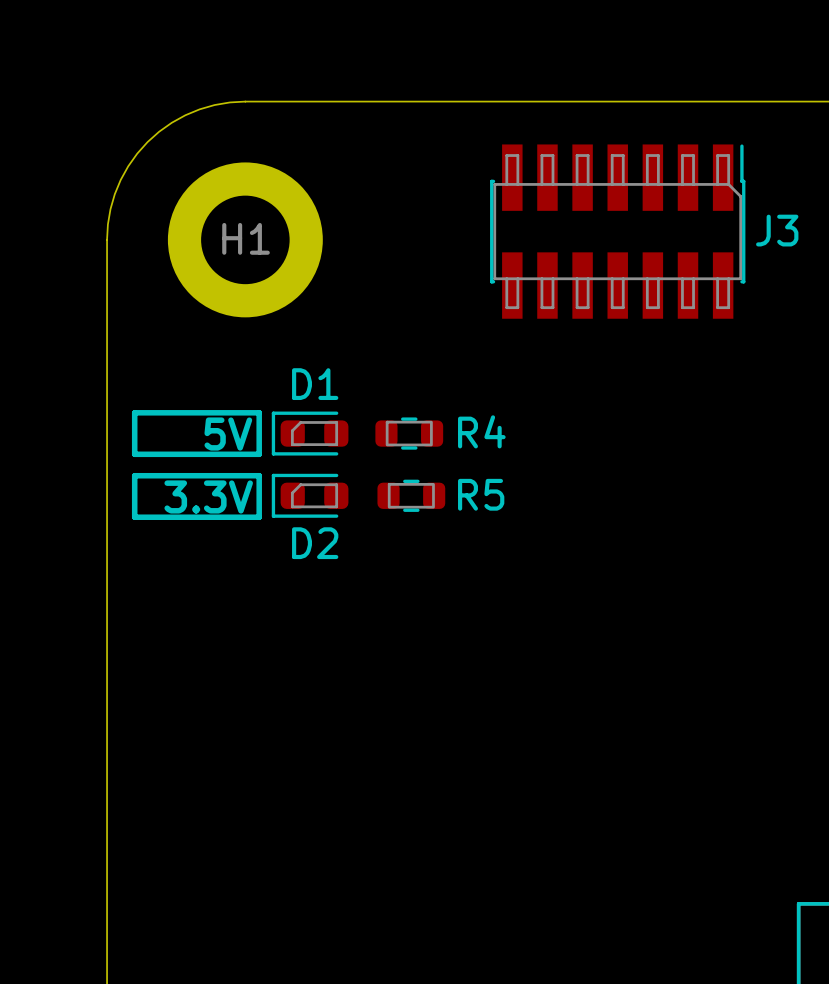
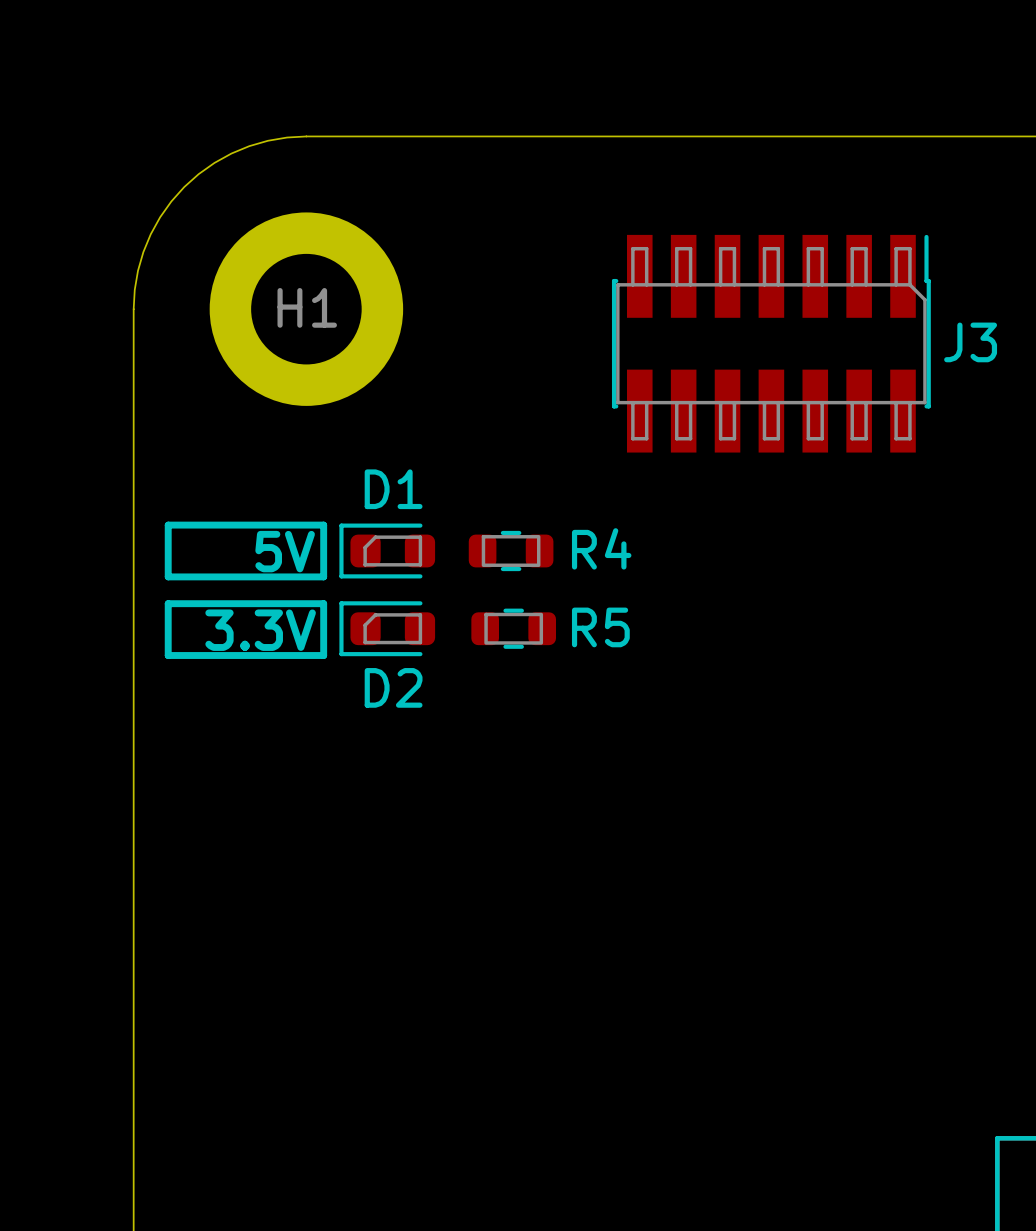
J3 position: (617, 231) -> (771, 343)

